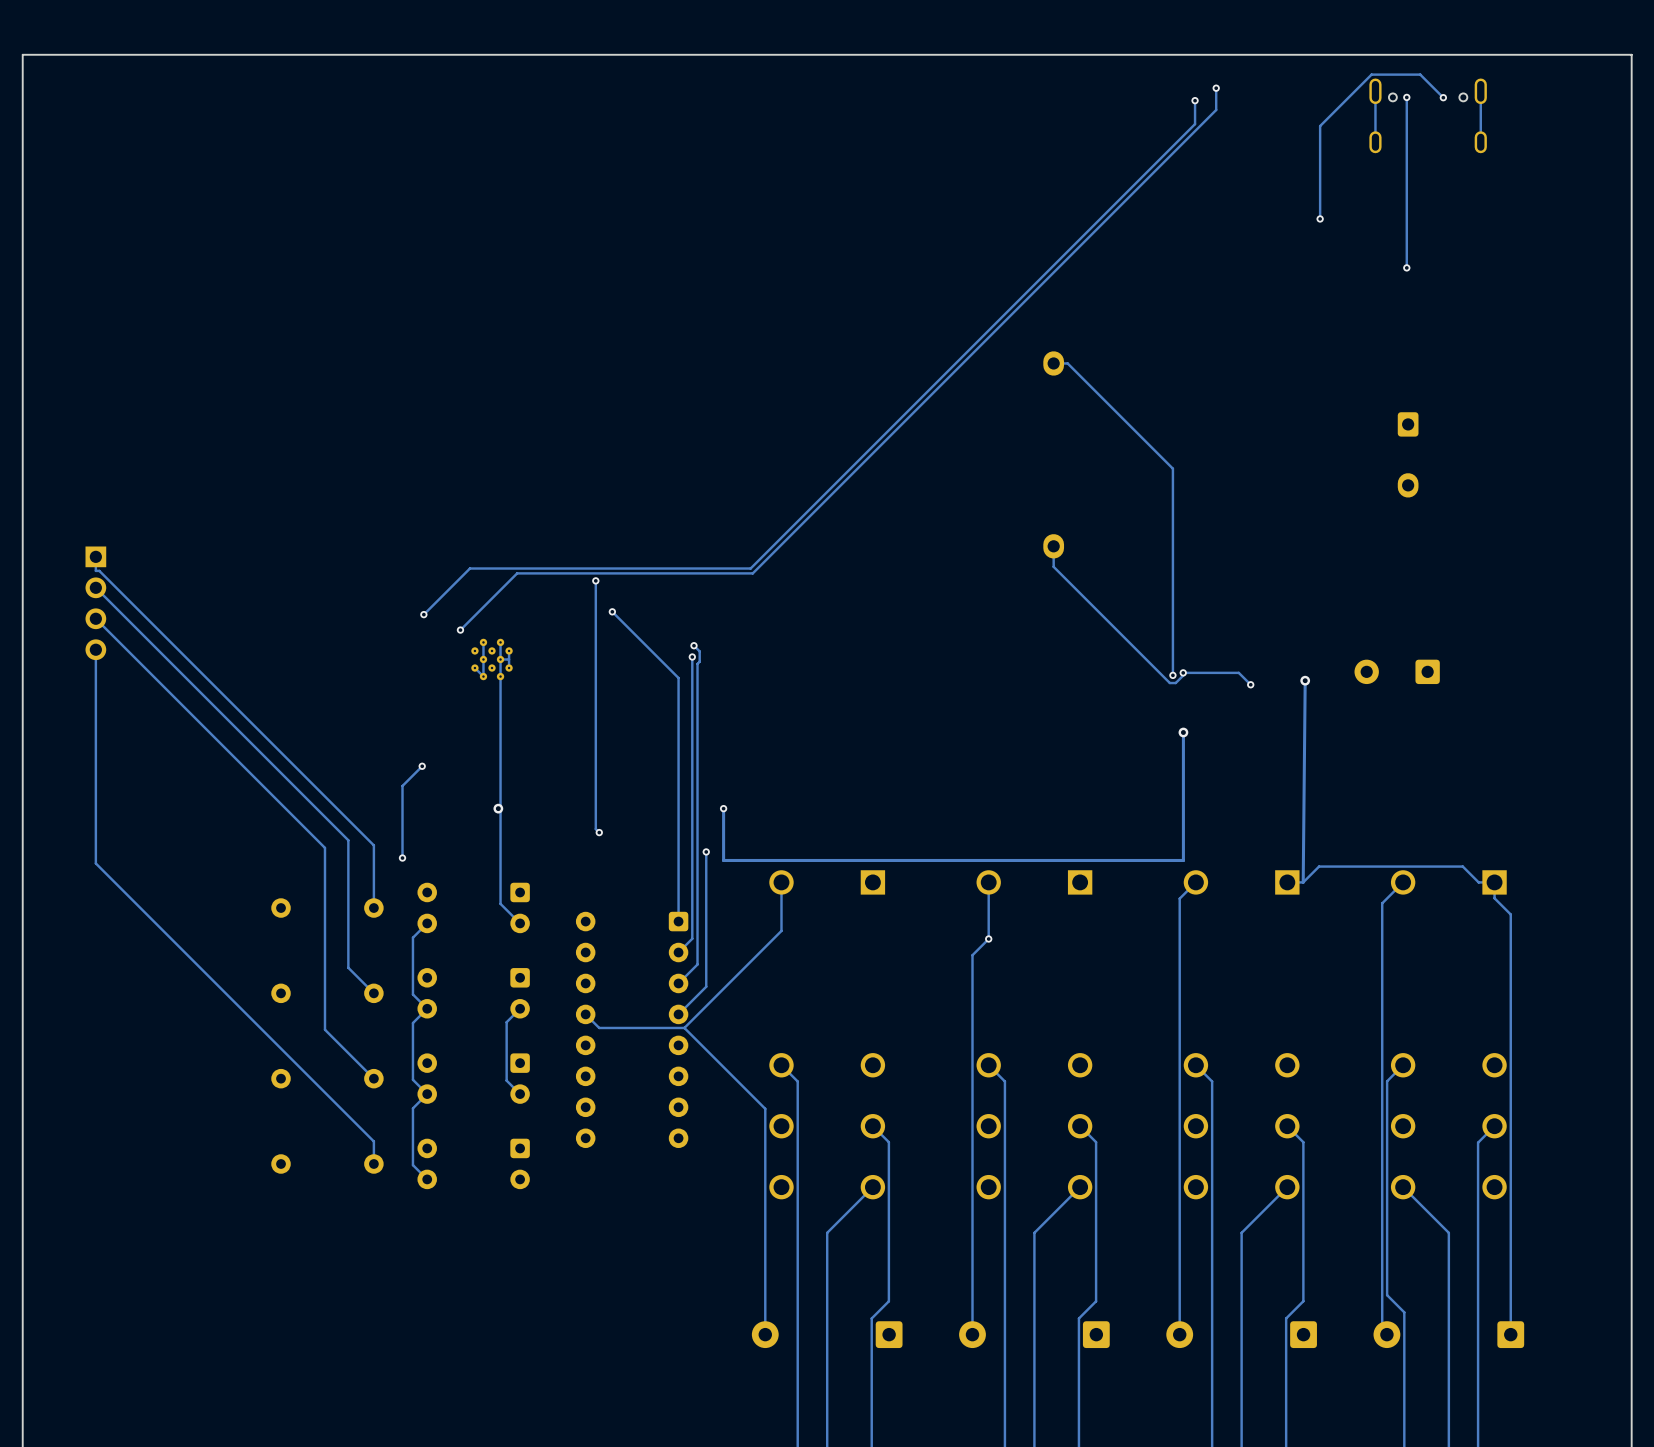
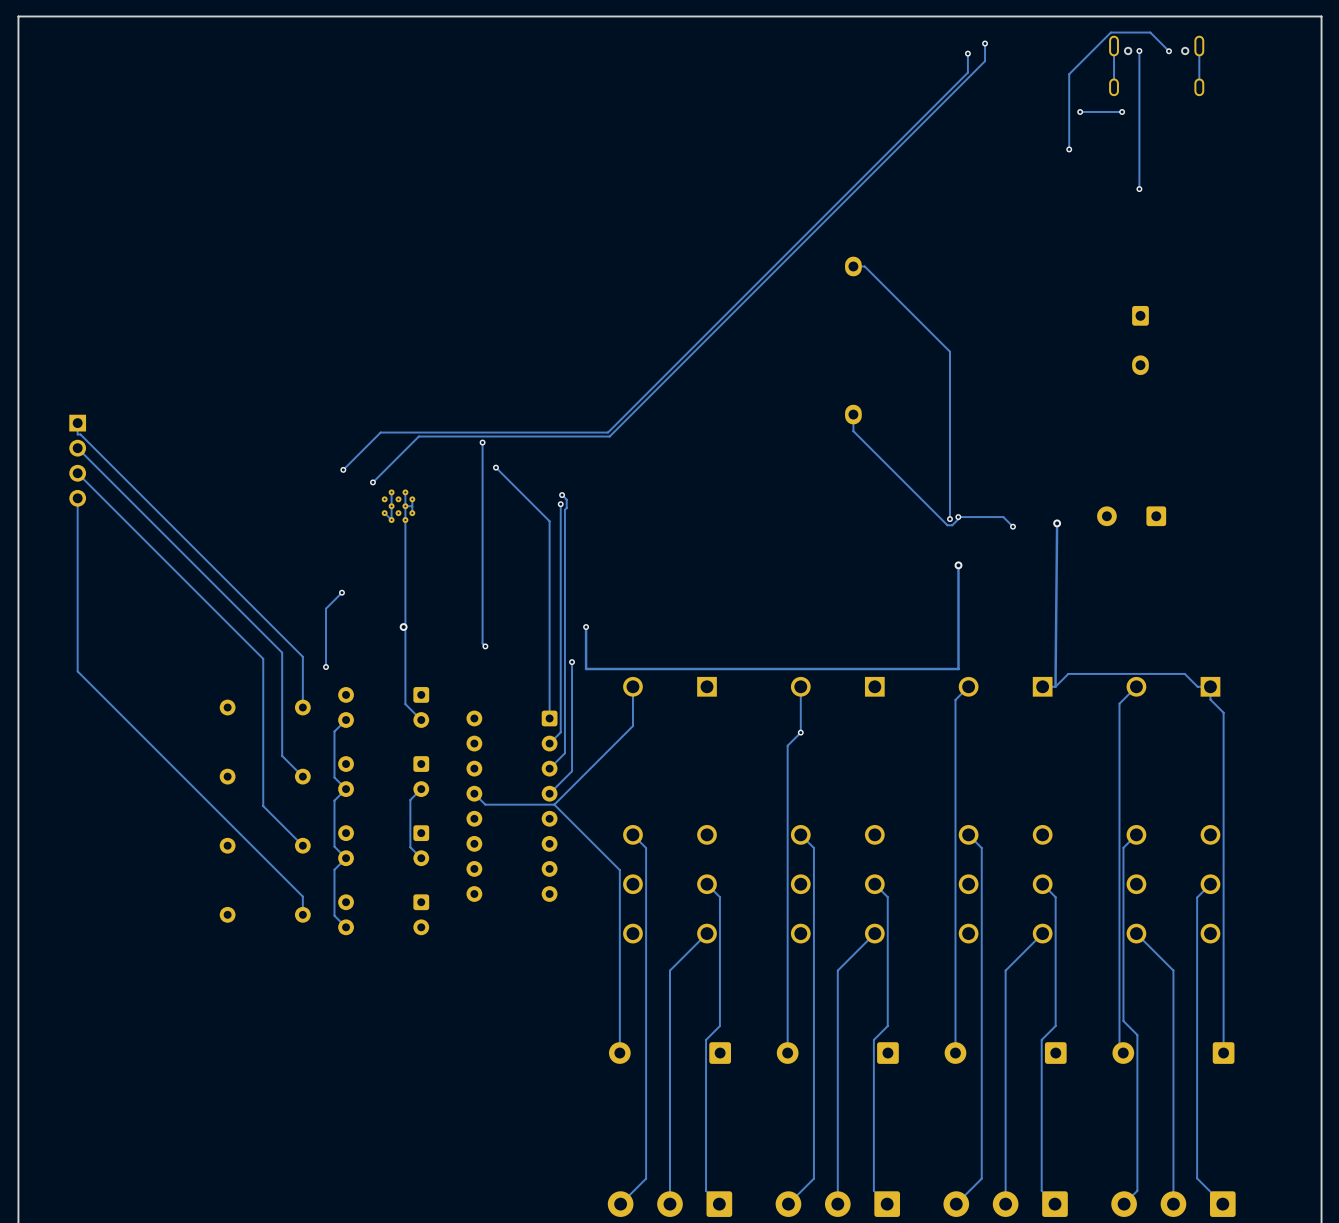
via: none -> (1080, 111)
track: none -> (1122, 111) (1080, 111)
via: none -> (1122, 111)

